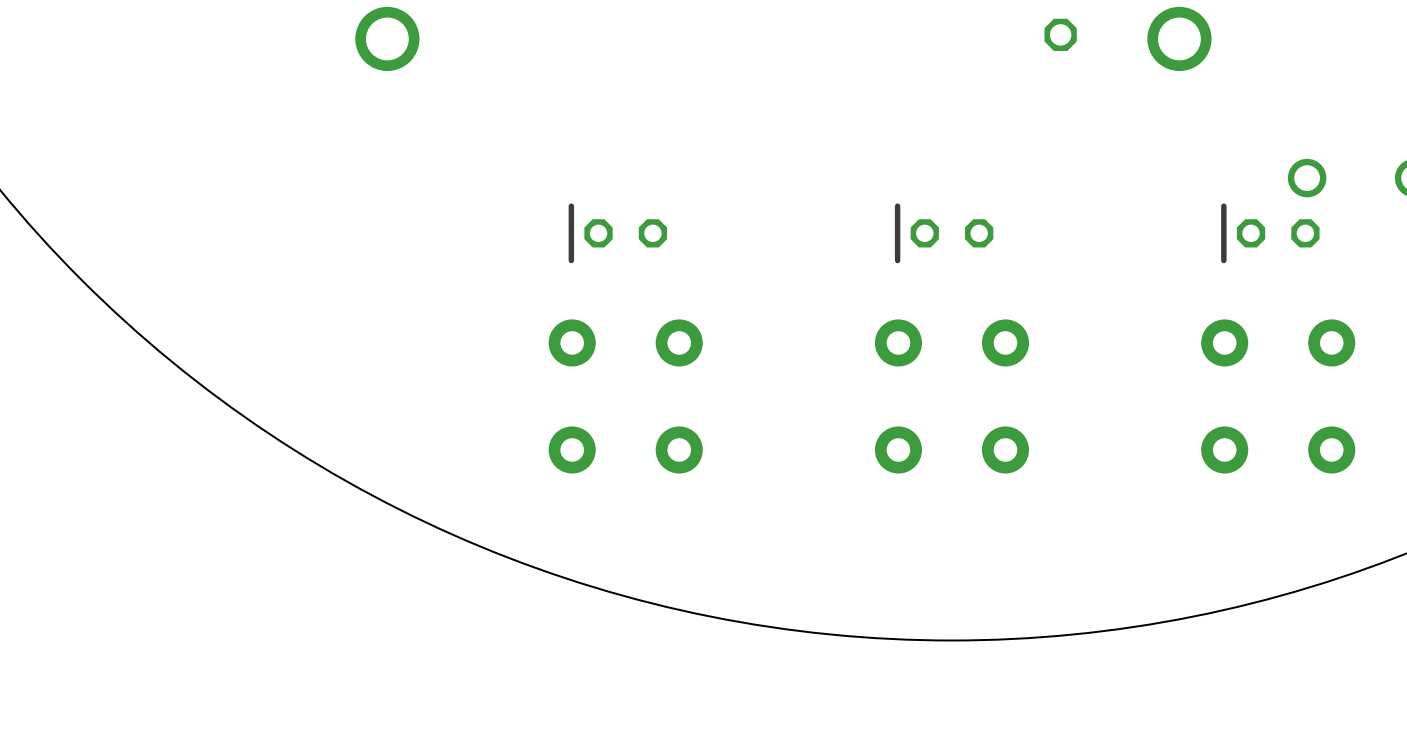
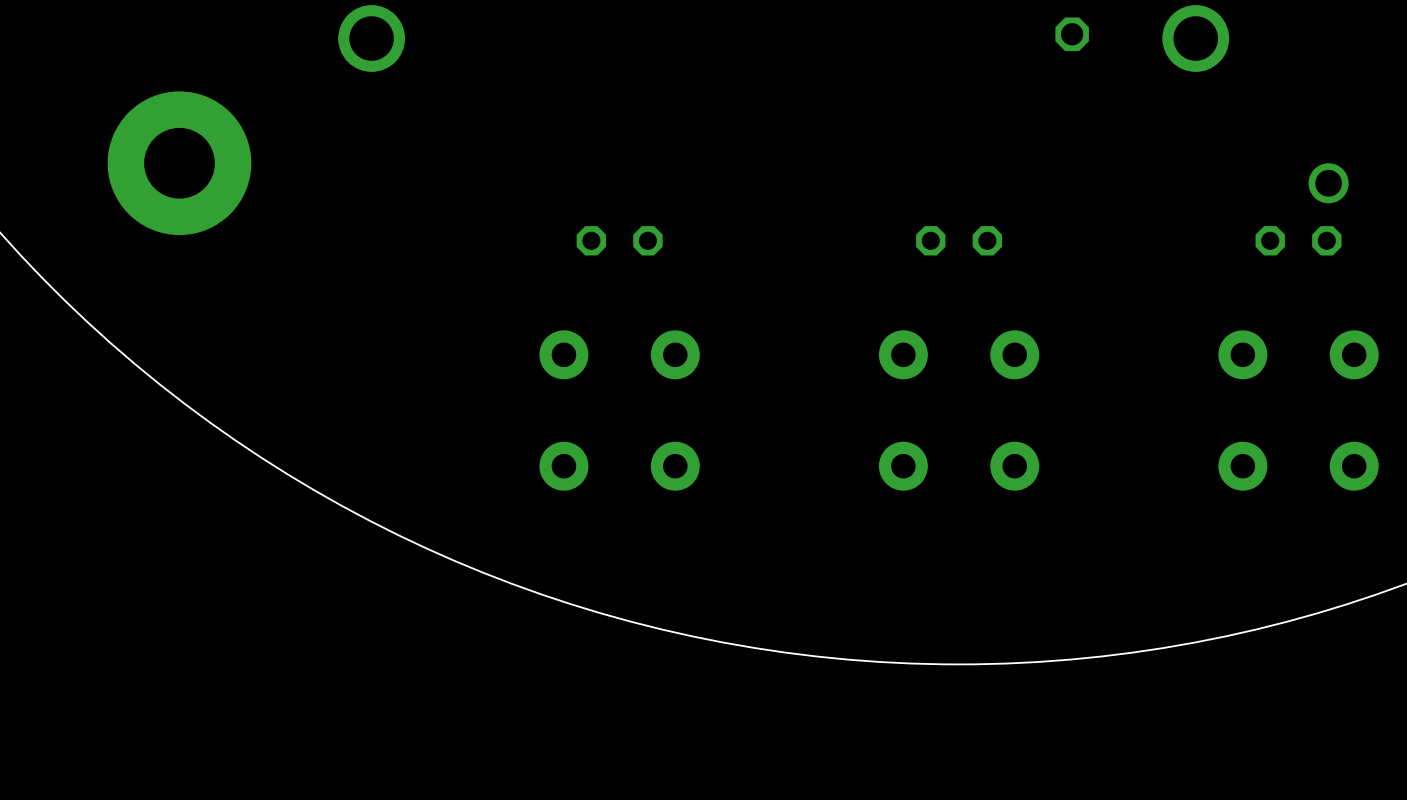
part: none -> (179, 163)
line: (571, 206) (571, 260) -> none
line: (897, 206) (897, 260) -> none
line: (1223, 206) (1223, 260) -> none

